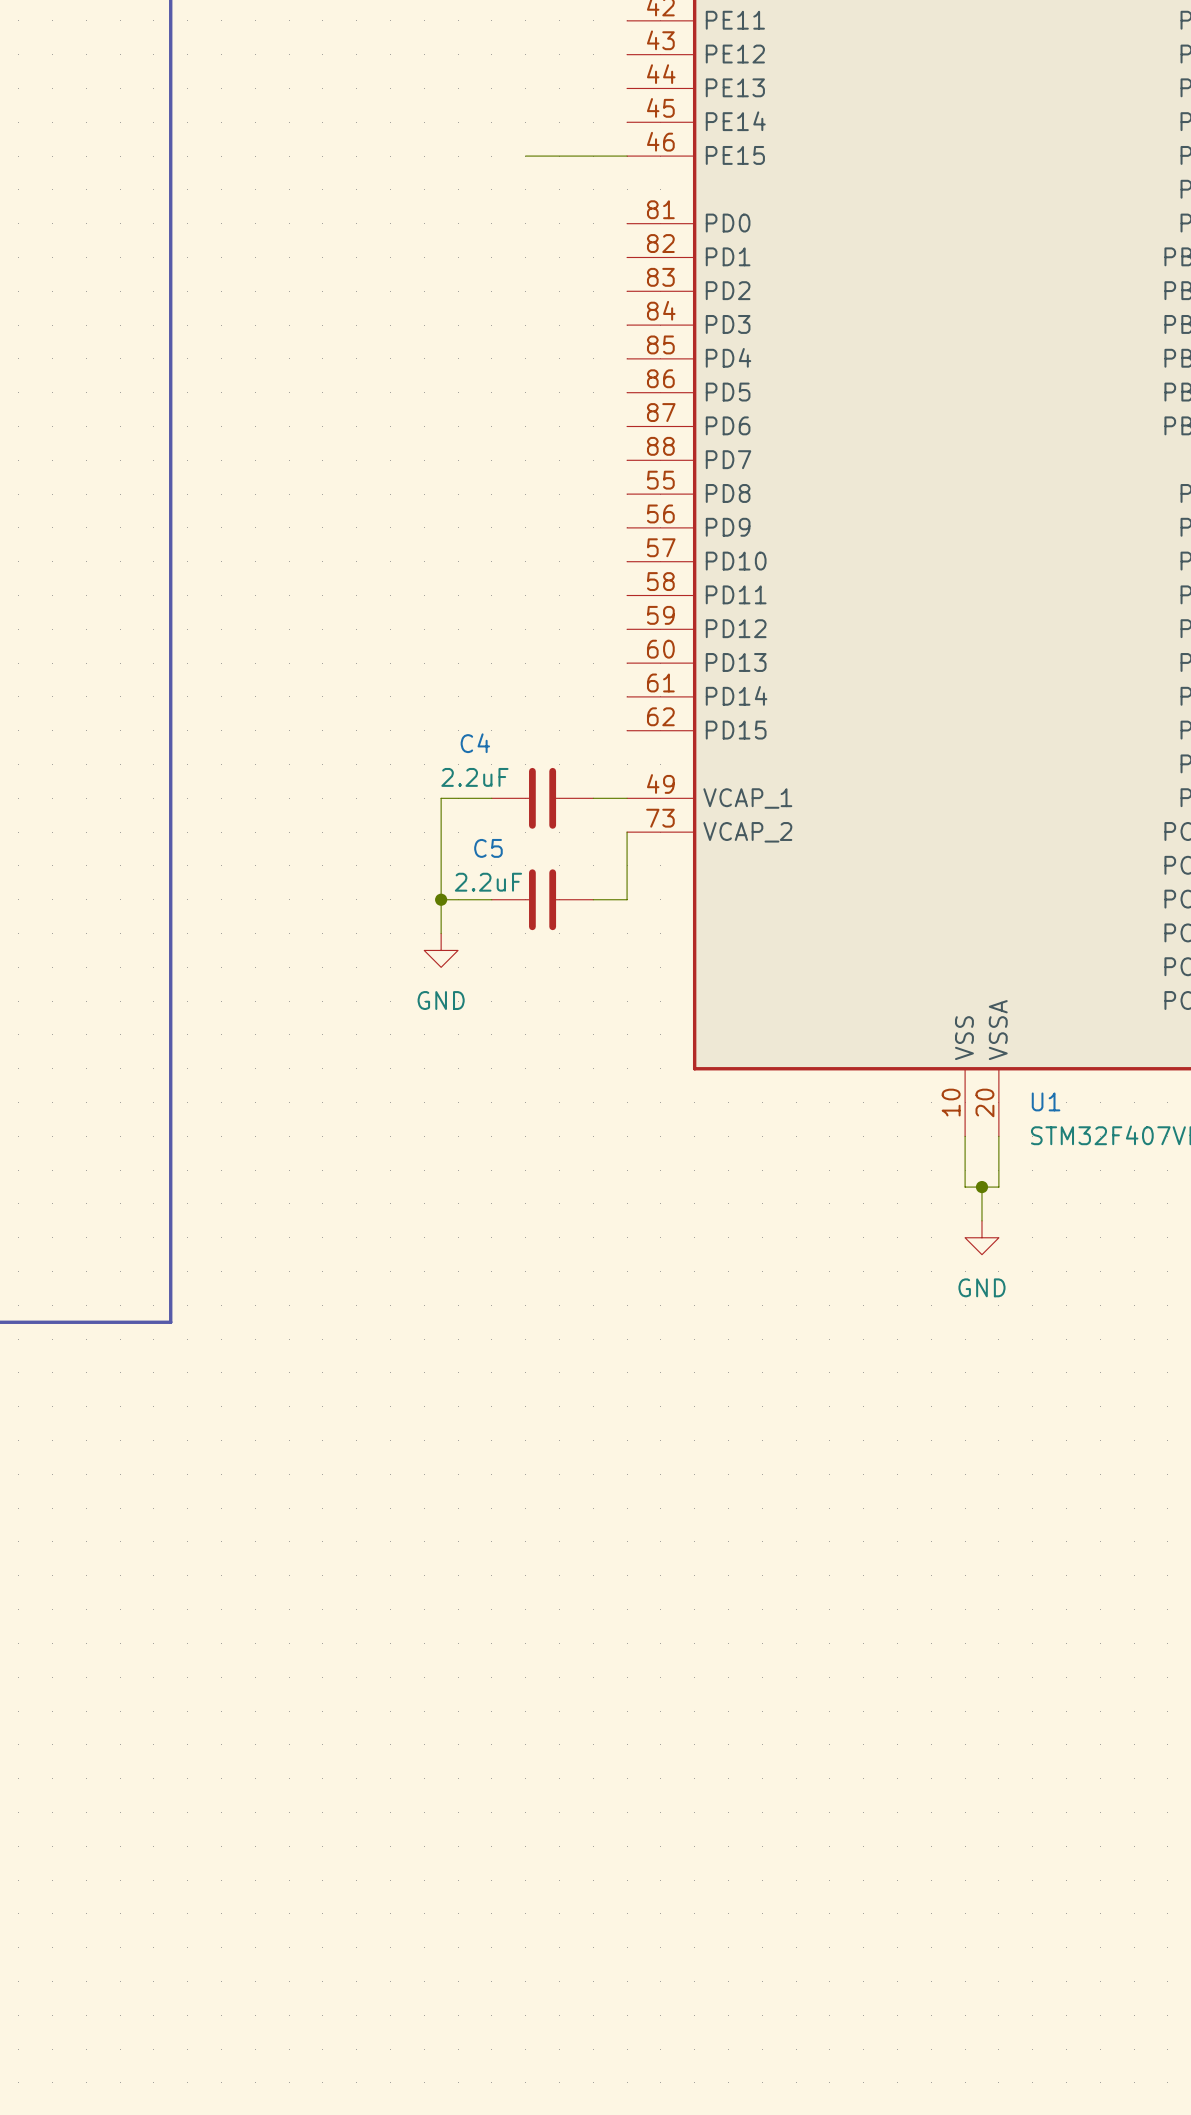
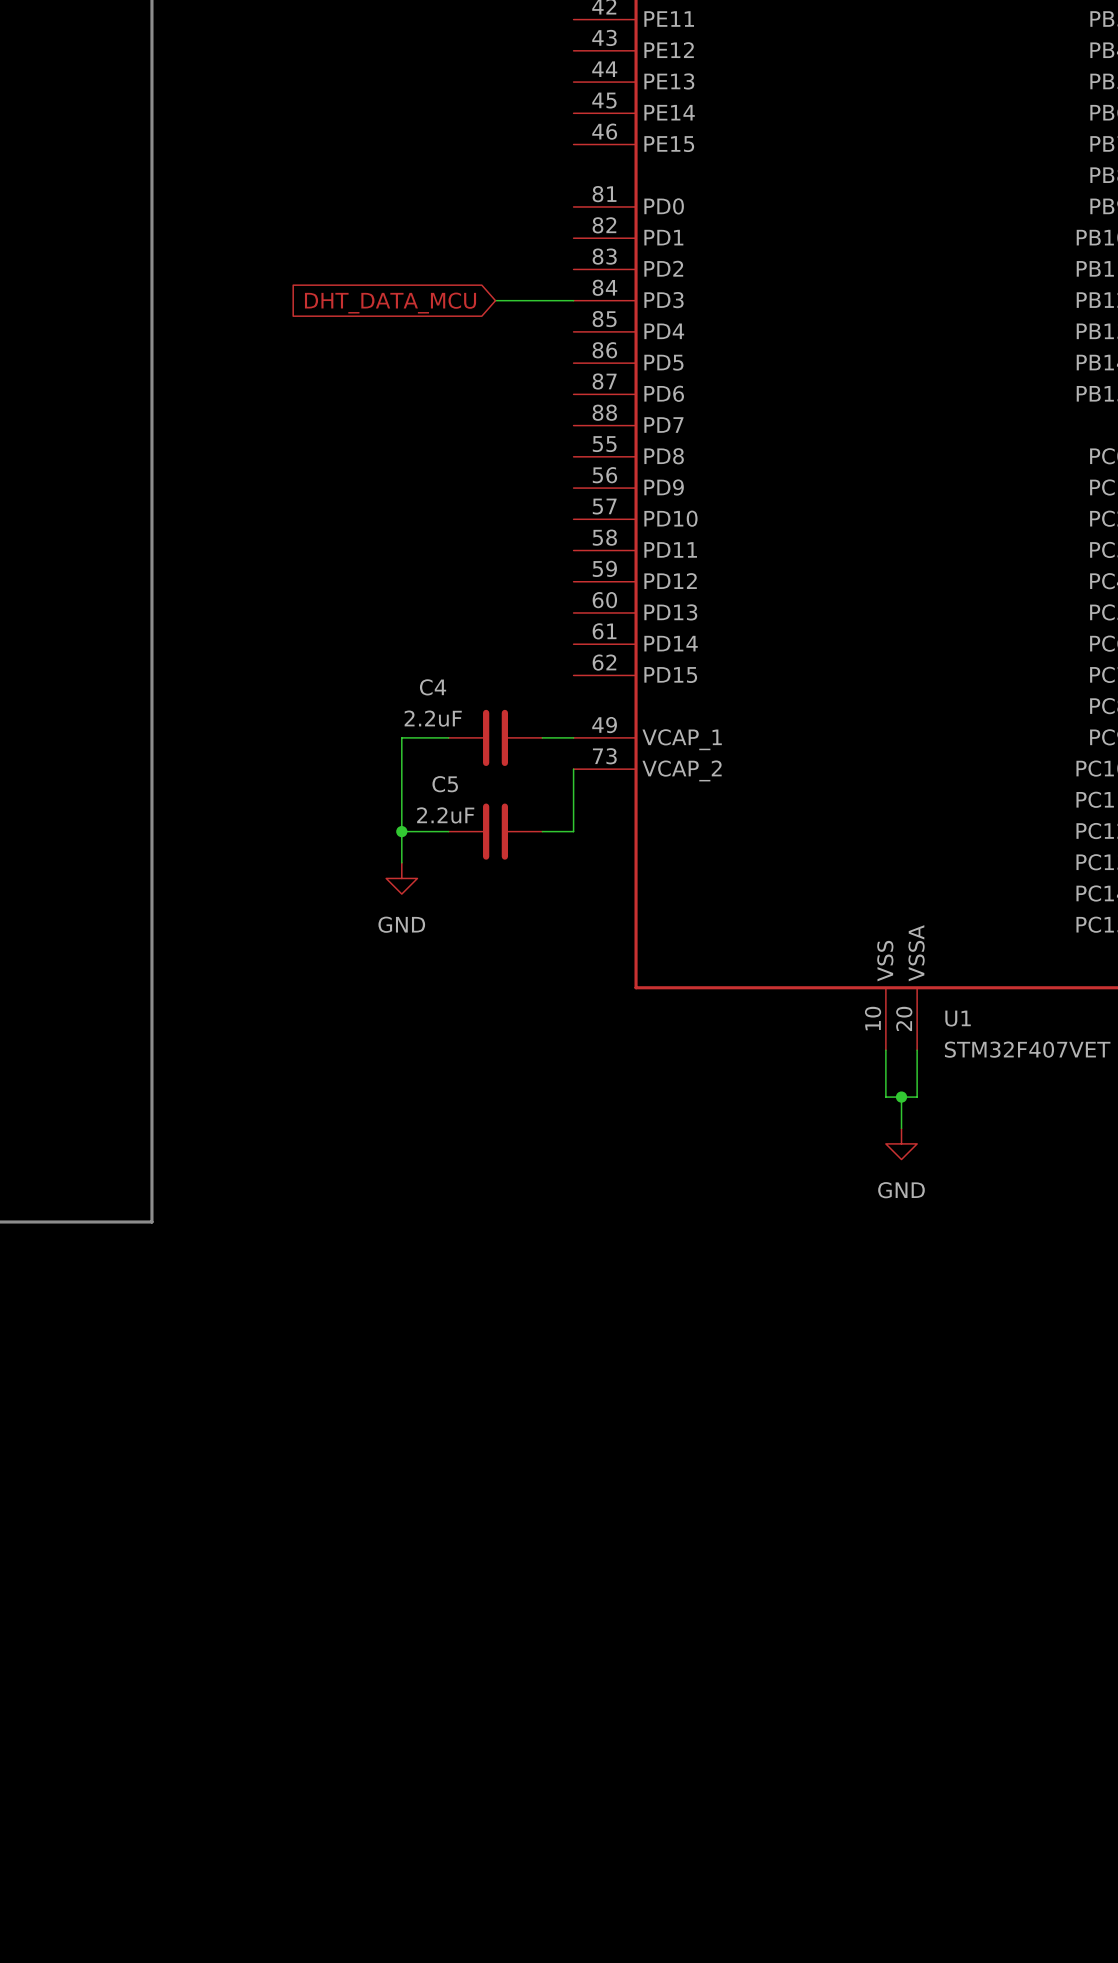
wire: (525, 156) (627, 156) -> none
global label: none -> DHT_DATA_MCU (390, 303)
wire: none -> (495, 300) (573, 300)

